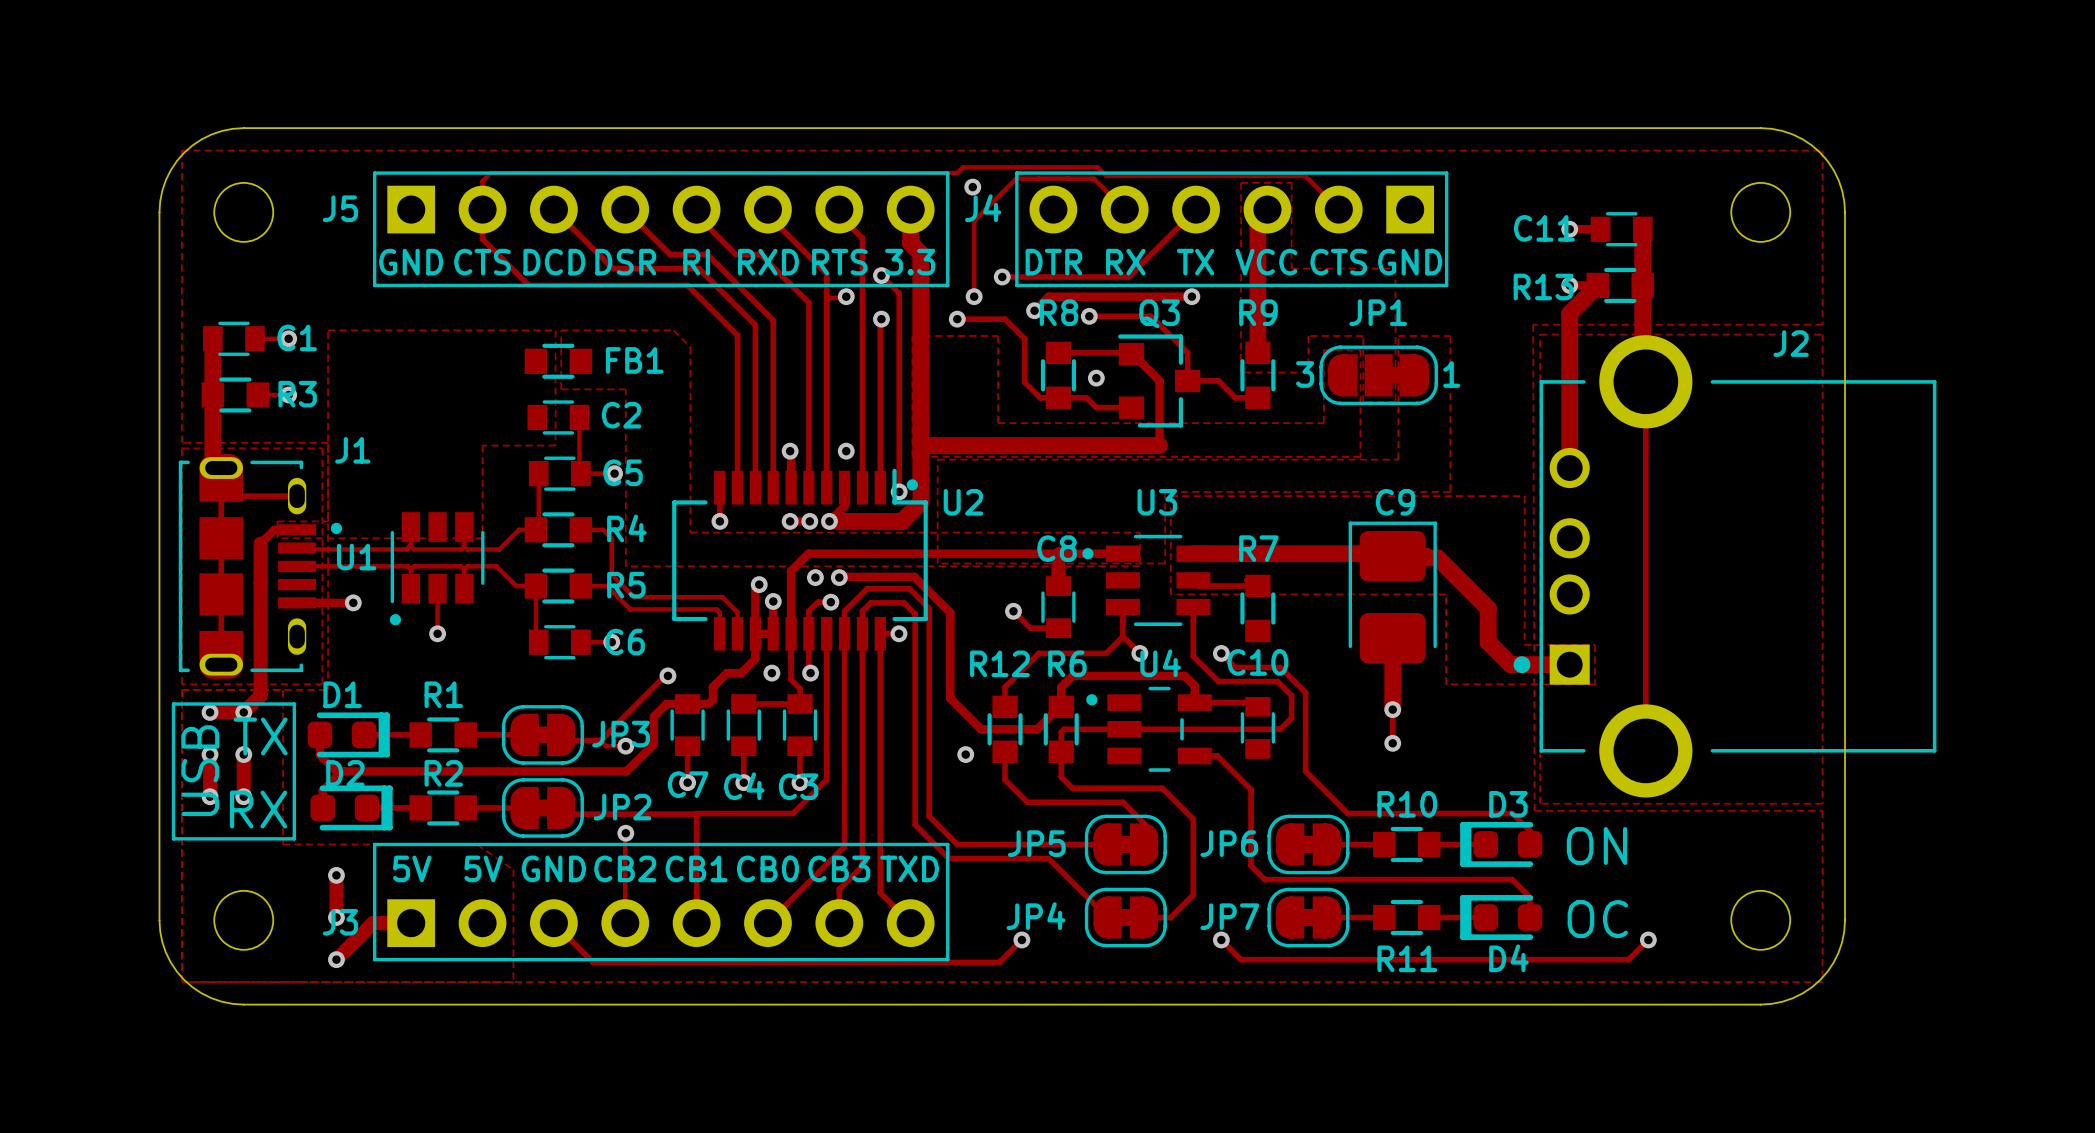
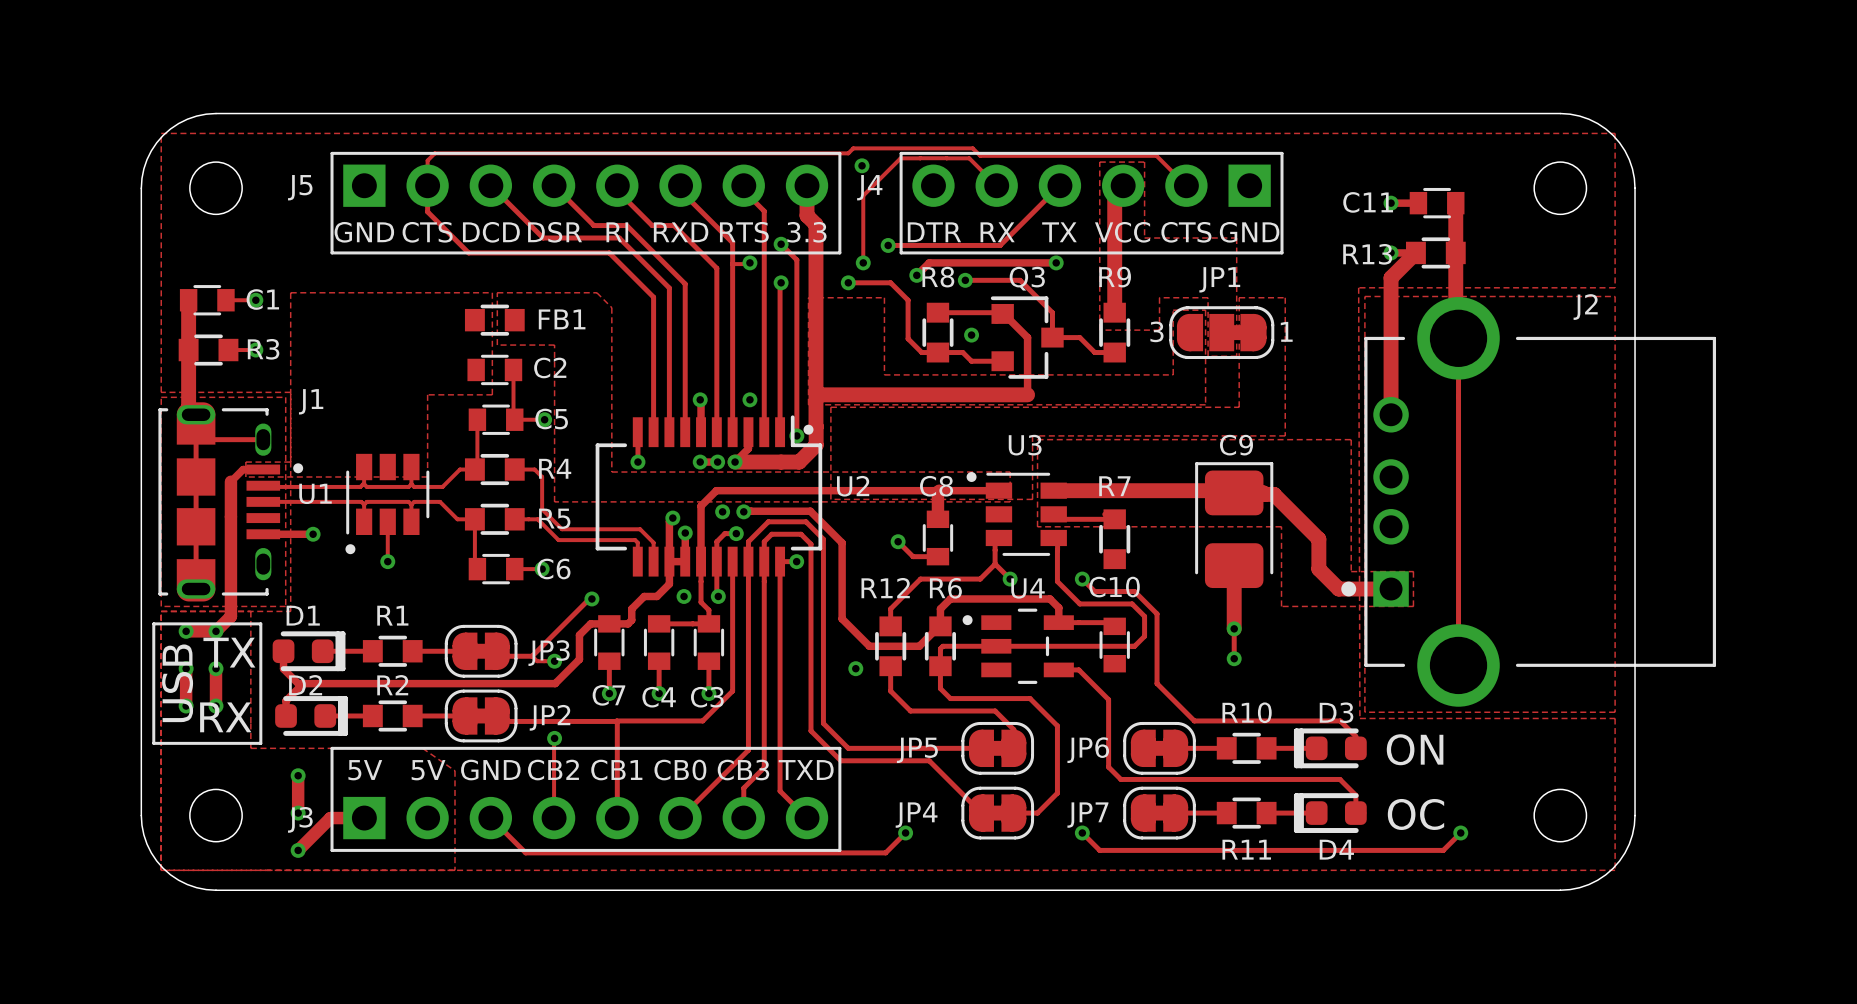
U2 name position: U2 (963, 502) -> U2 (853, 486)
U3 footprint: [1082, 534, 1211, 627] -> [966, 472, 1067, 556]

